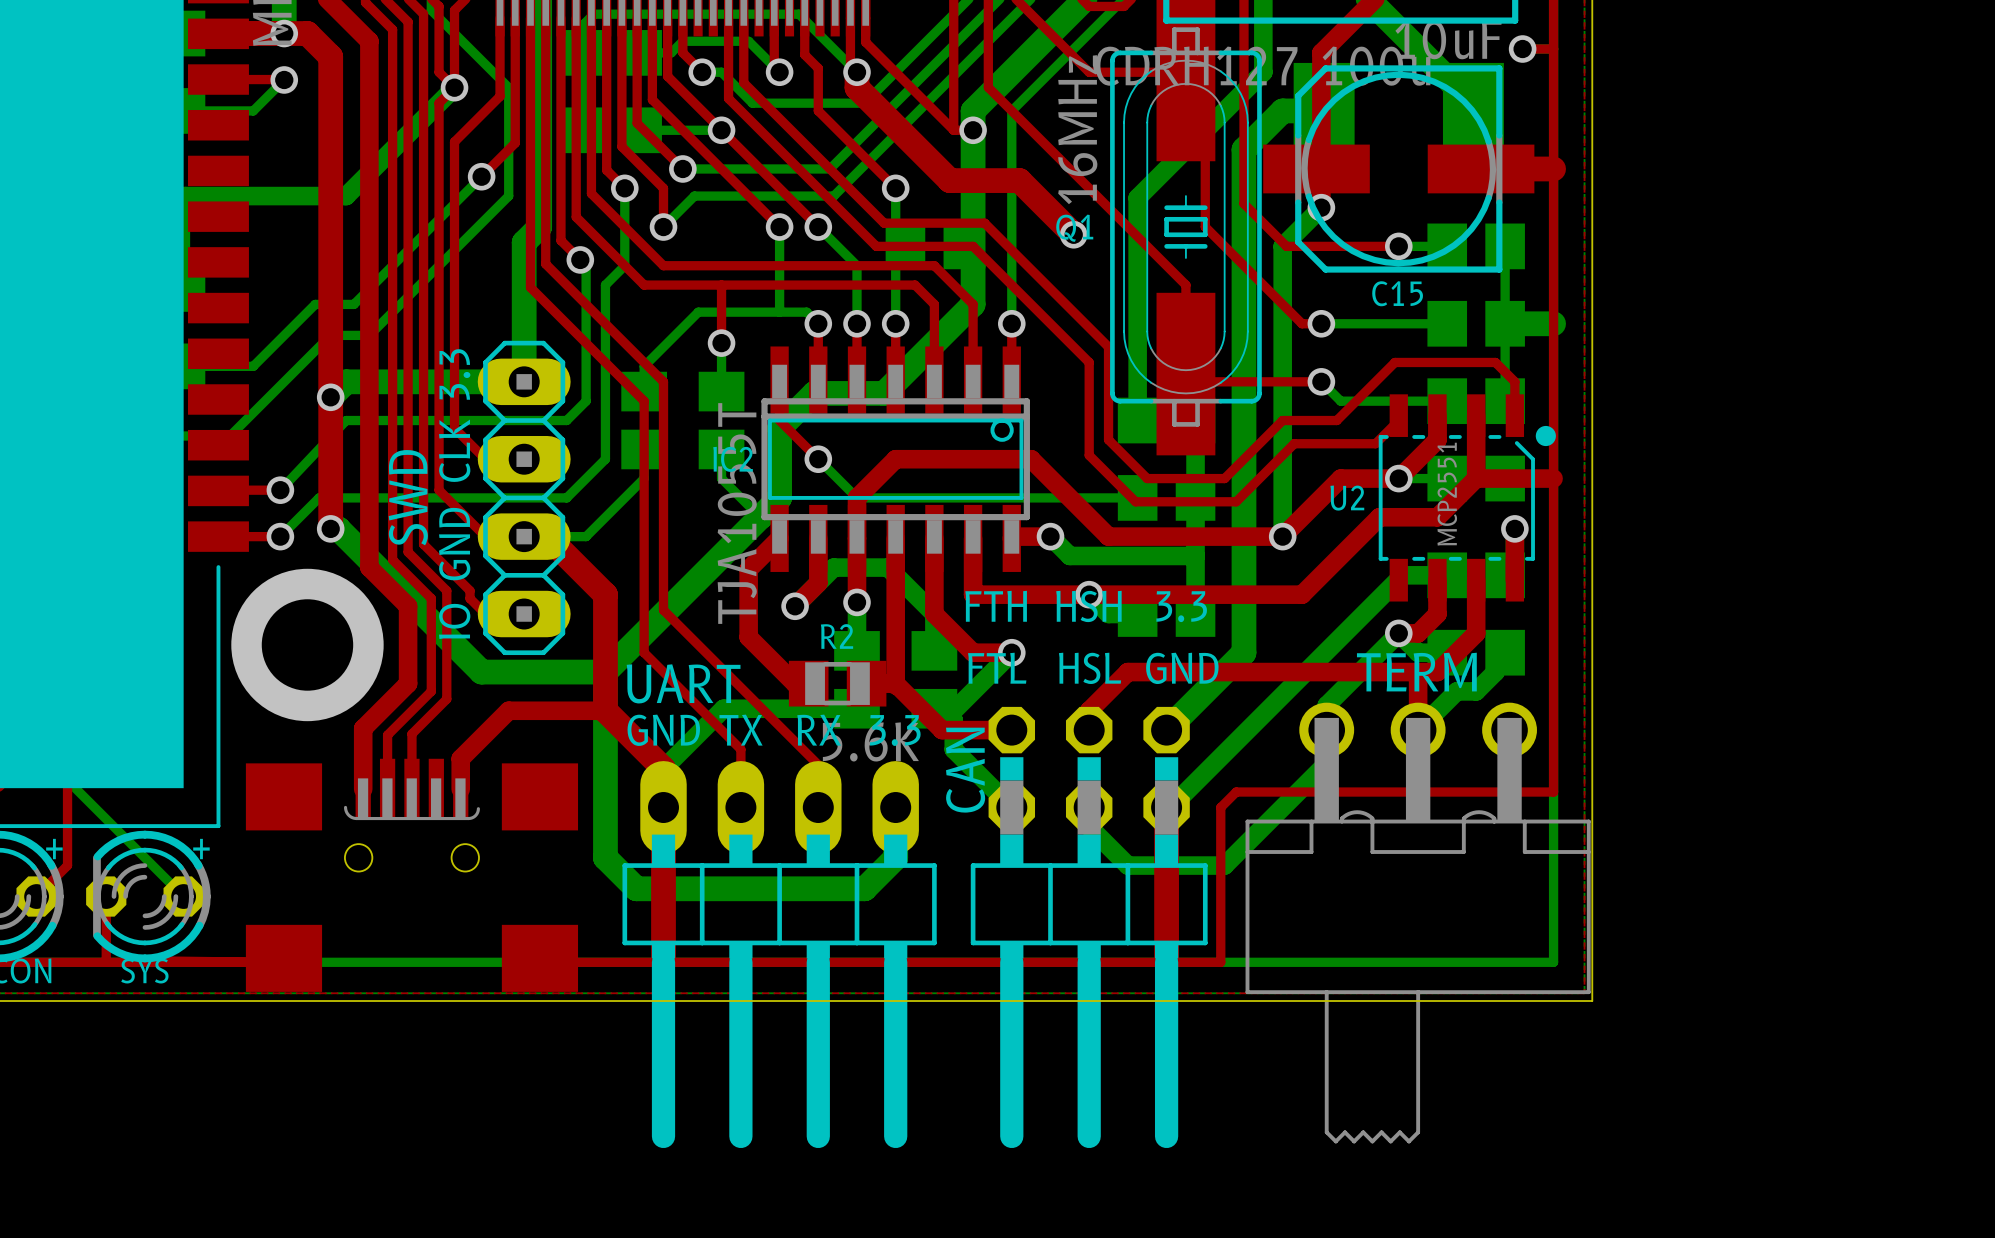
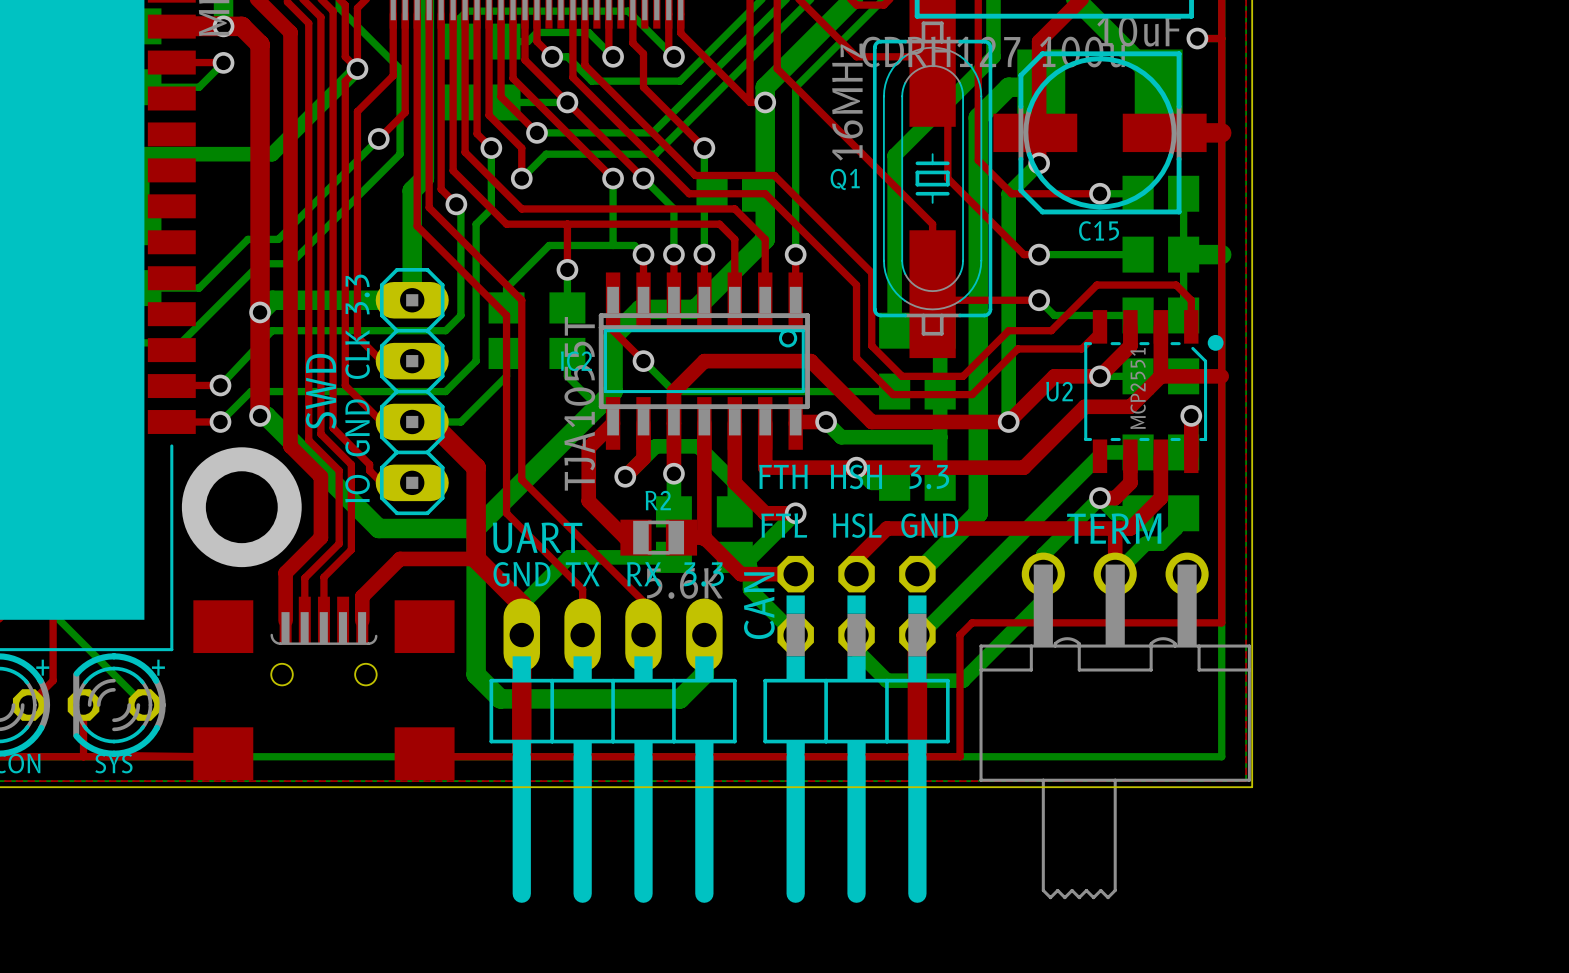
top track: (857, 72) (857, 87) (949, 180) (1019, 180) (1073, 234) -> none
via: (1073, 234) -> none

